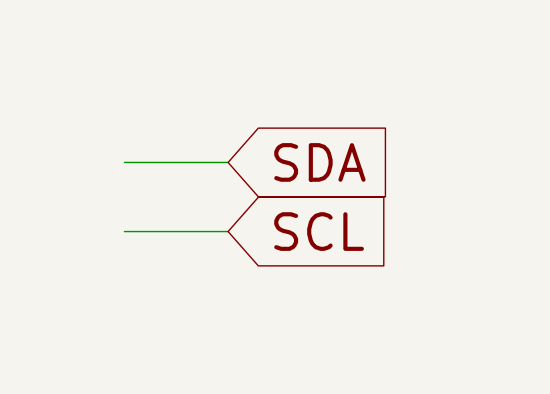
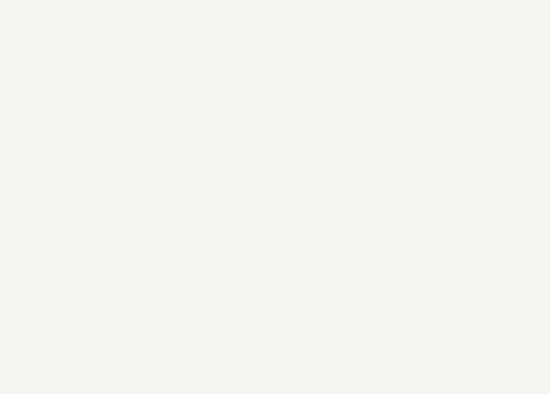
wire: (124, 162) (228, 162) -> none
global label: SDA (319, 162) -> none
wire: (124, 231) (228, 231) -> none
global label: SCL (319, 231) -> none

